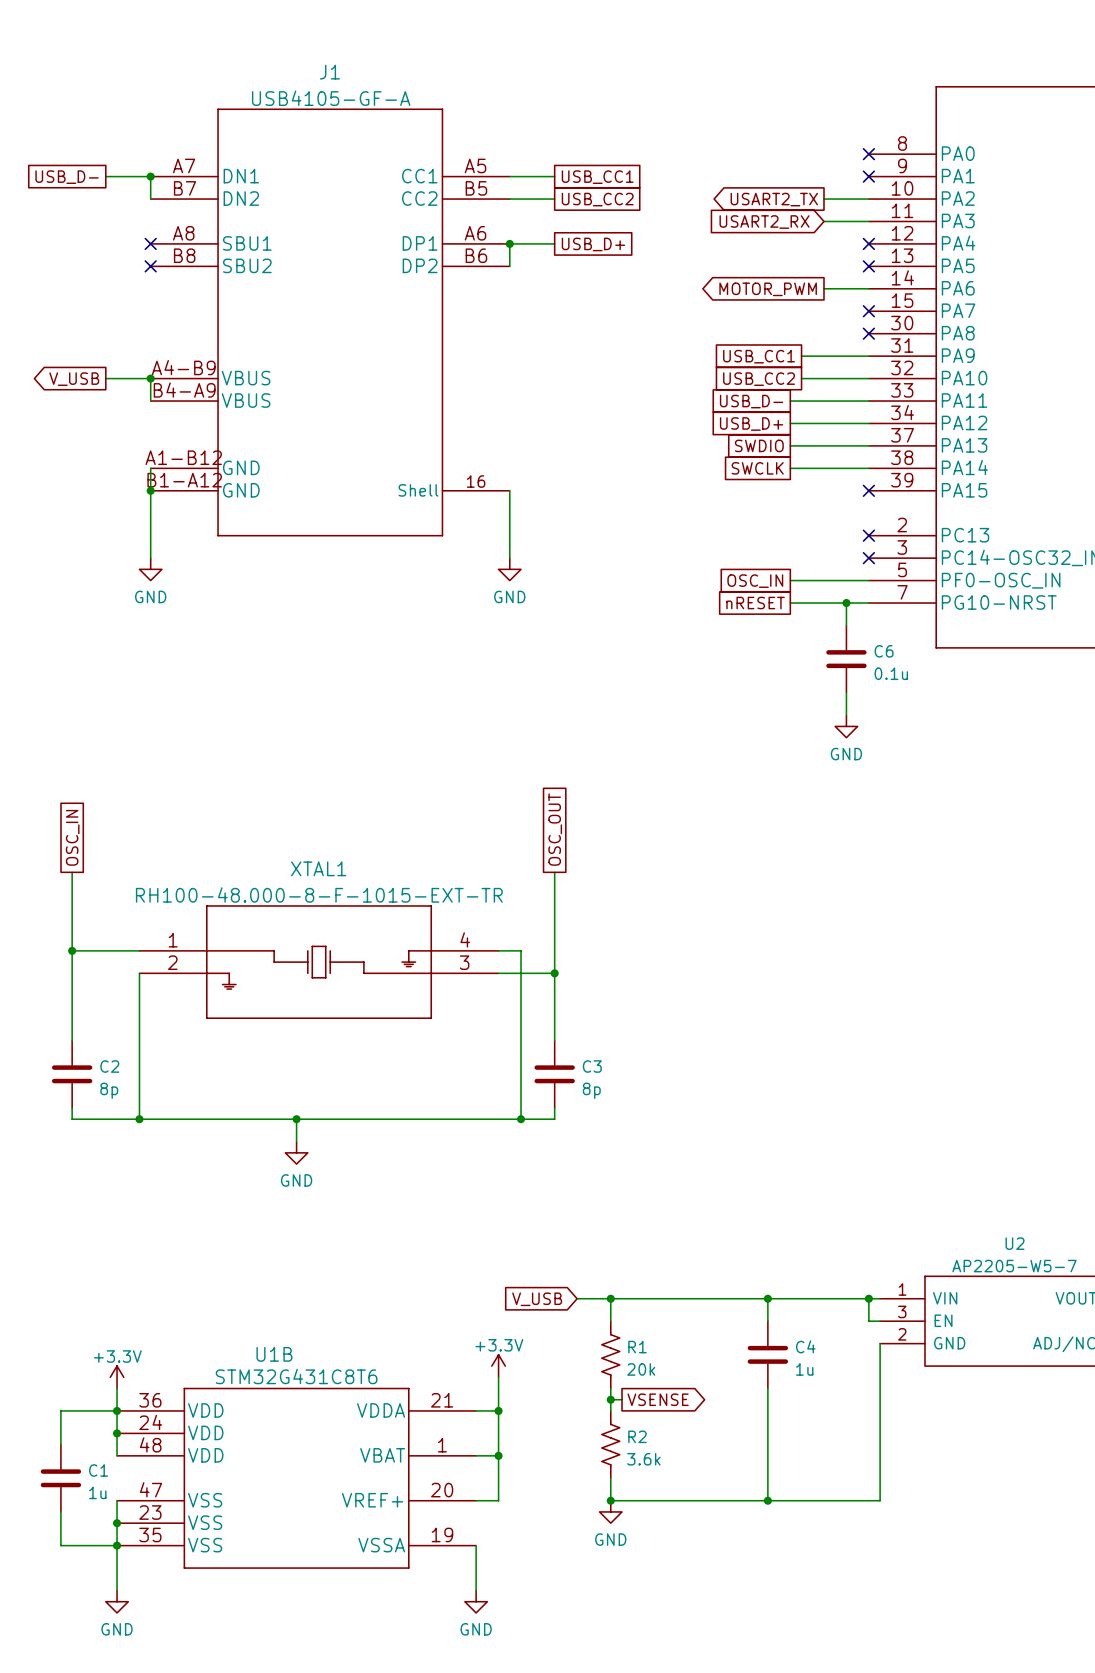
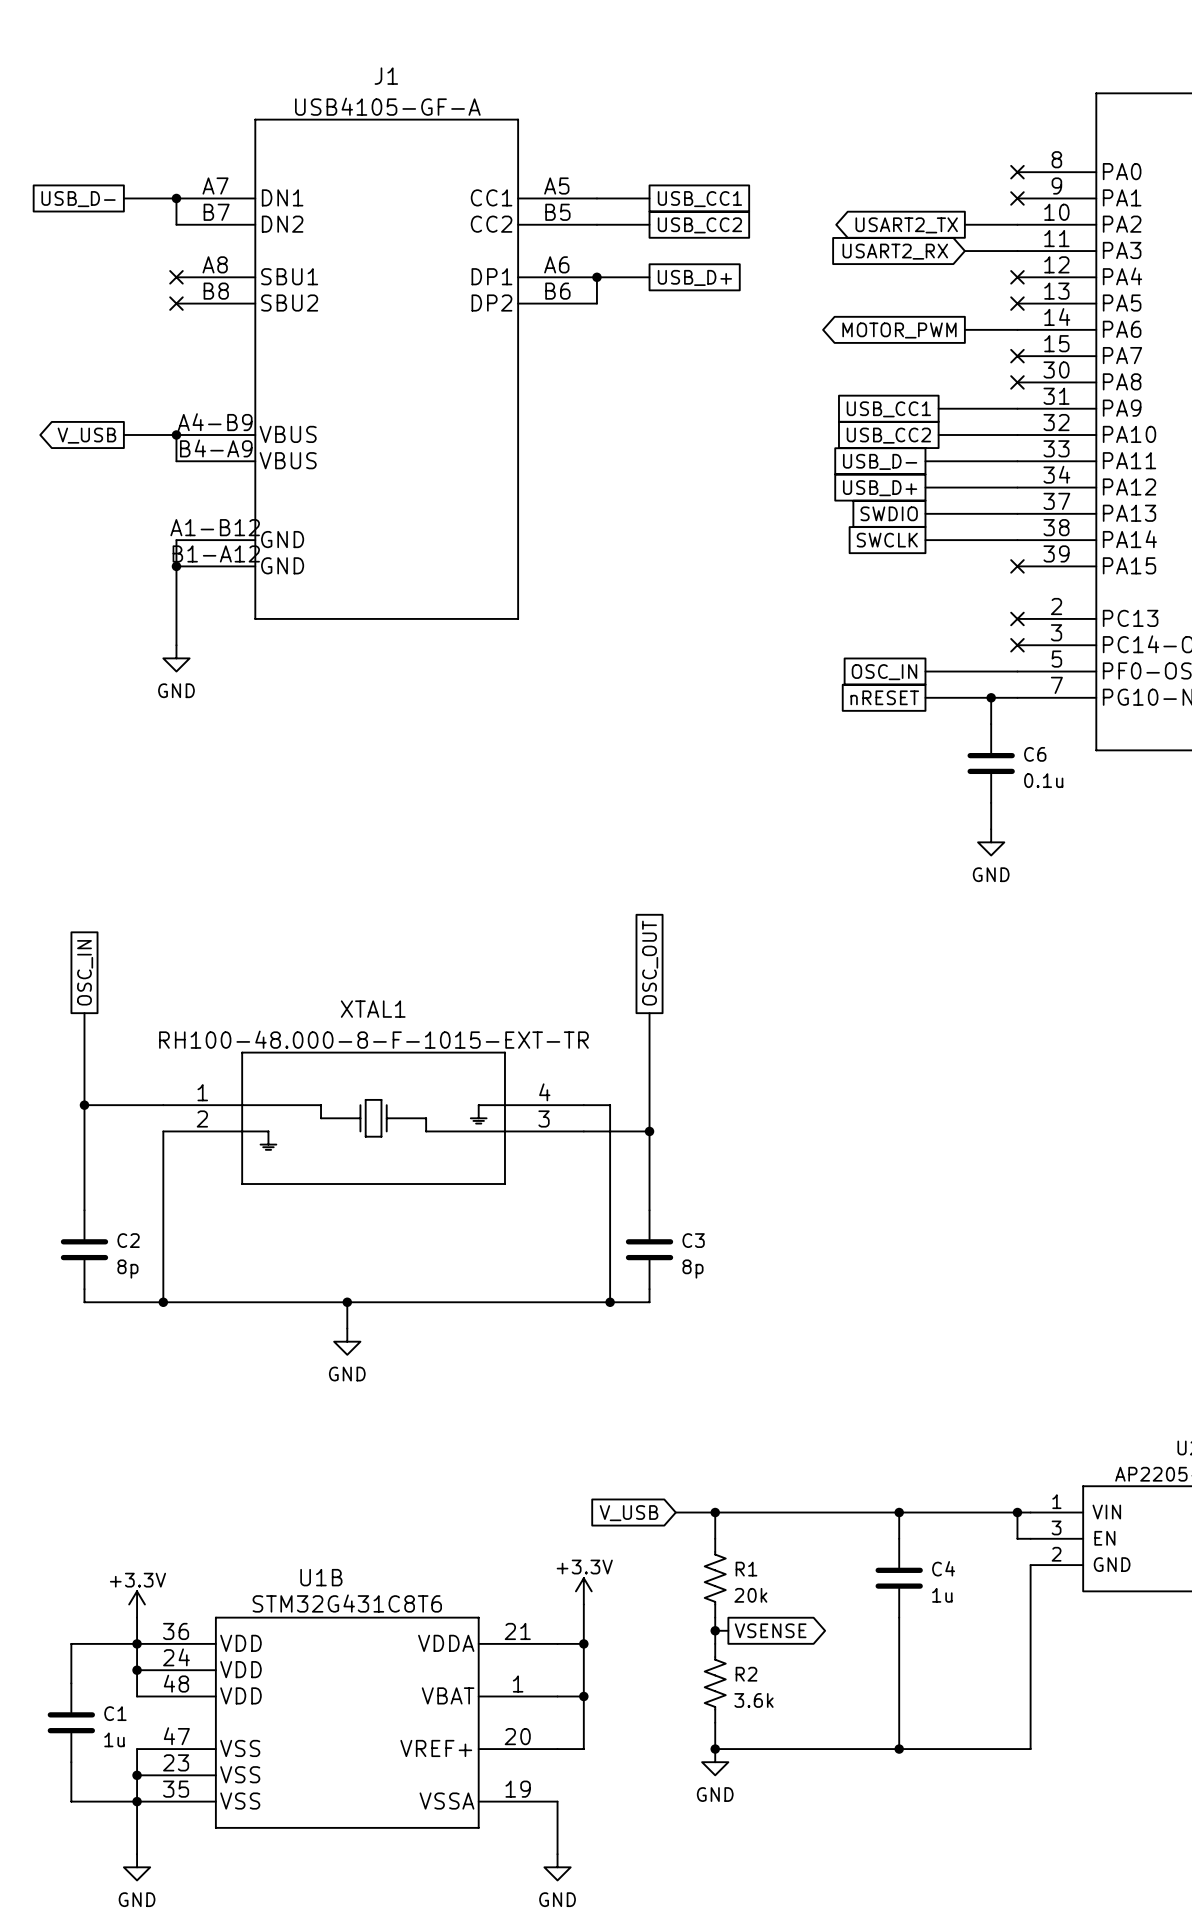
J1 symbol: [150, 108, 510, 537] -> [176, 118, 597, 620]
wire: (509, 490) (509, 558) -> none
power symbol: GND (509, 569) -> none

